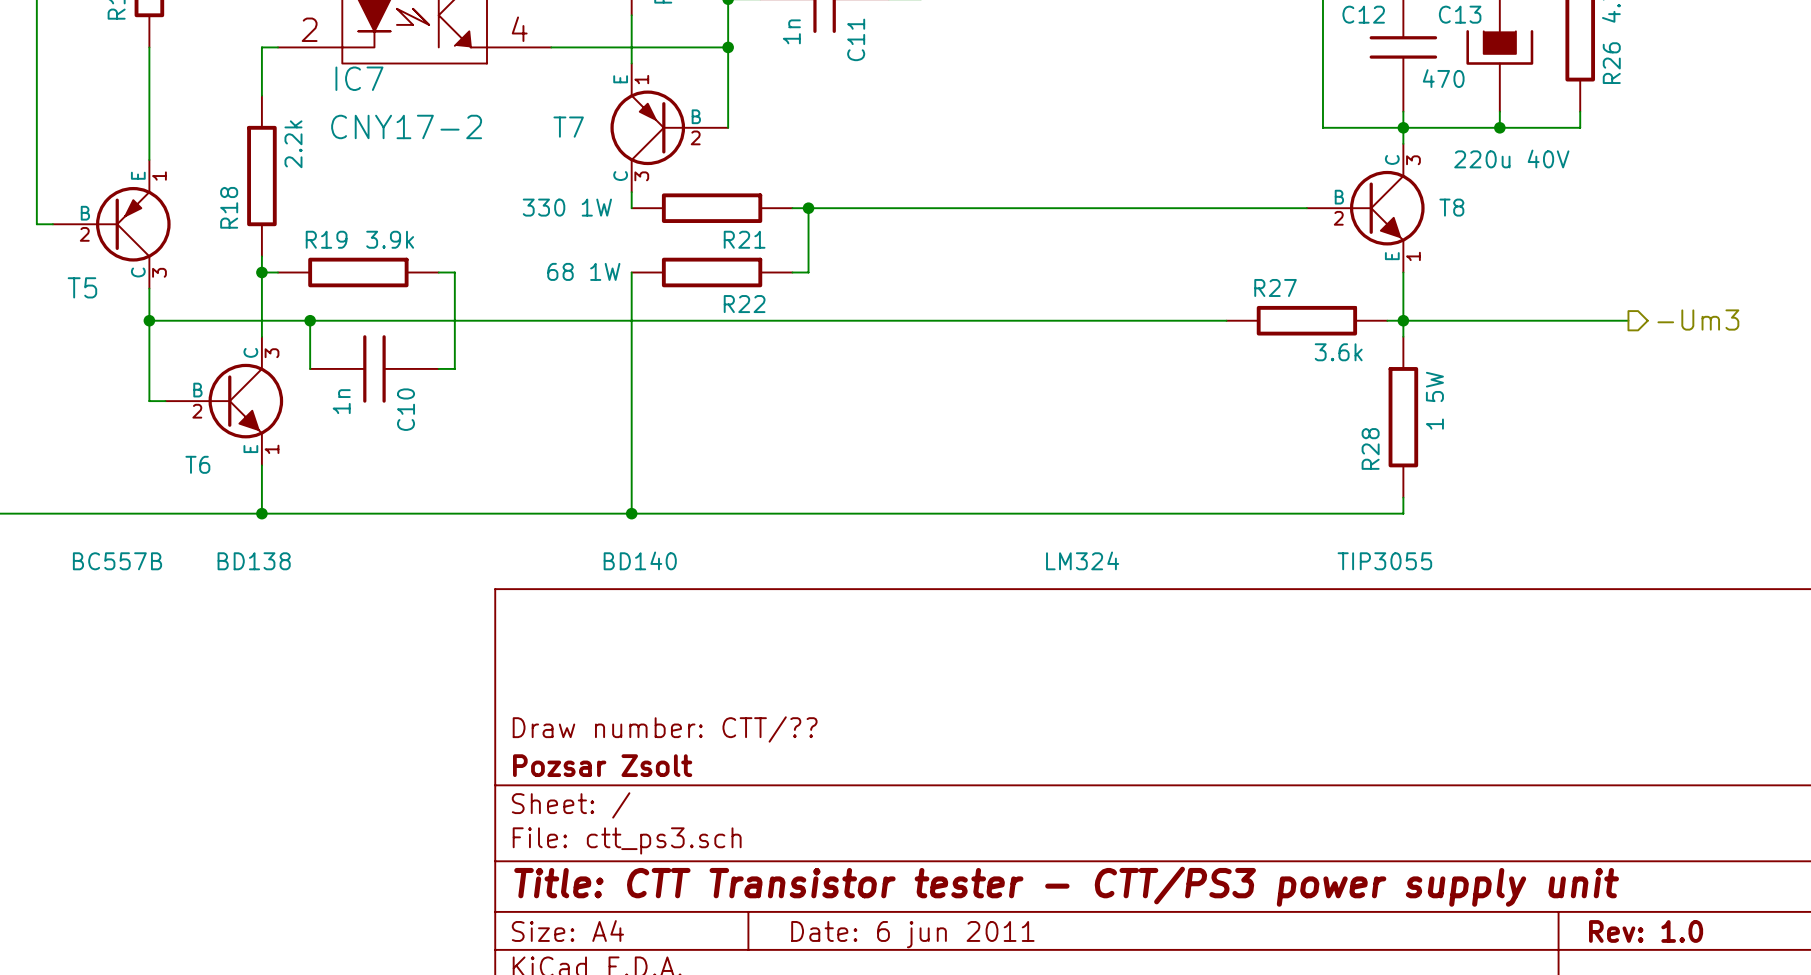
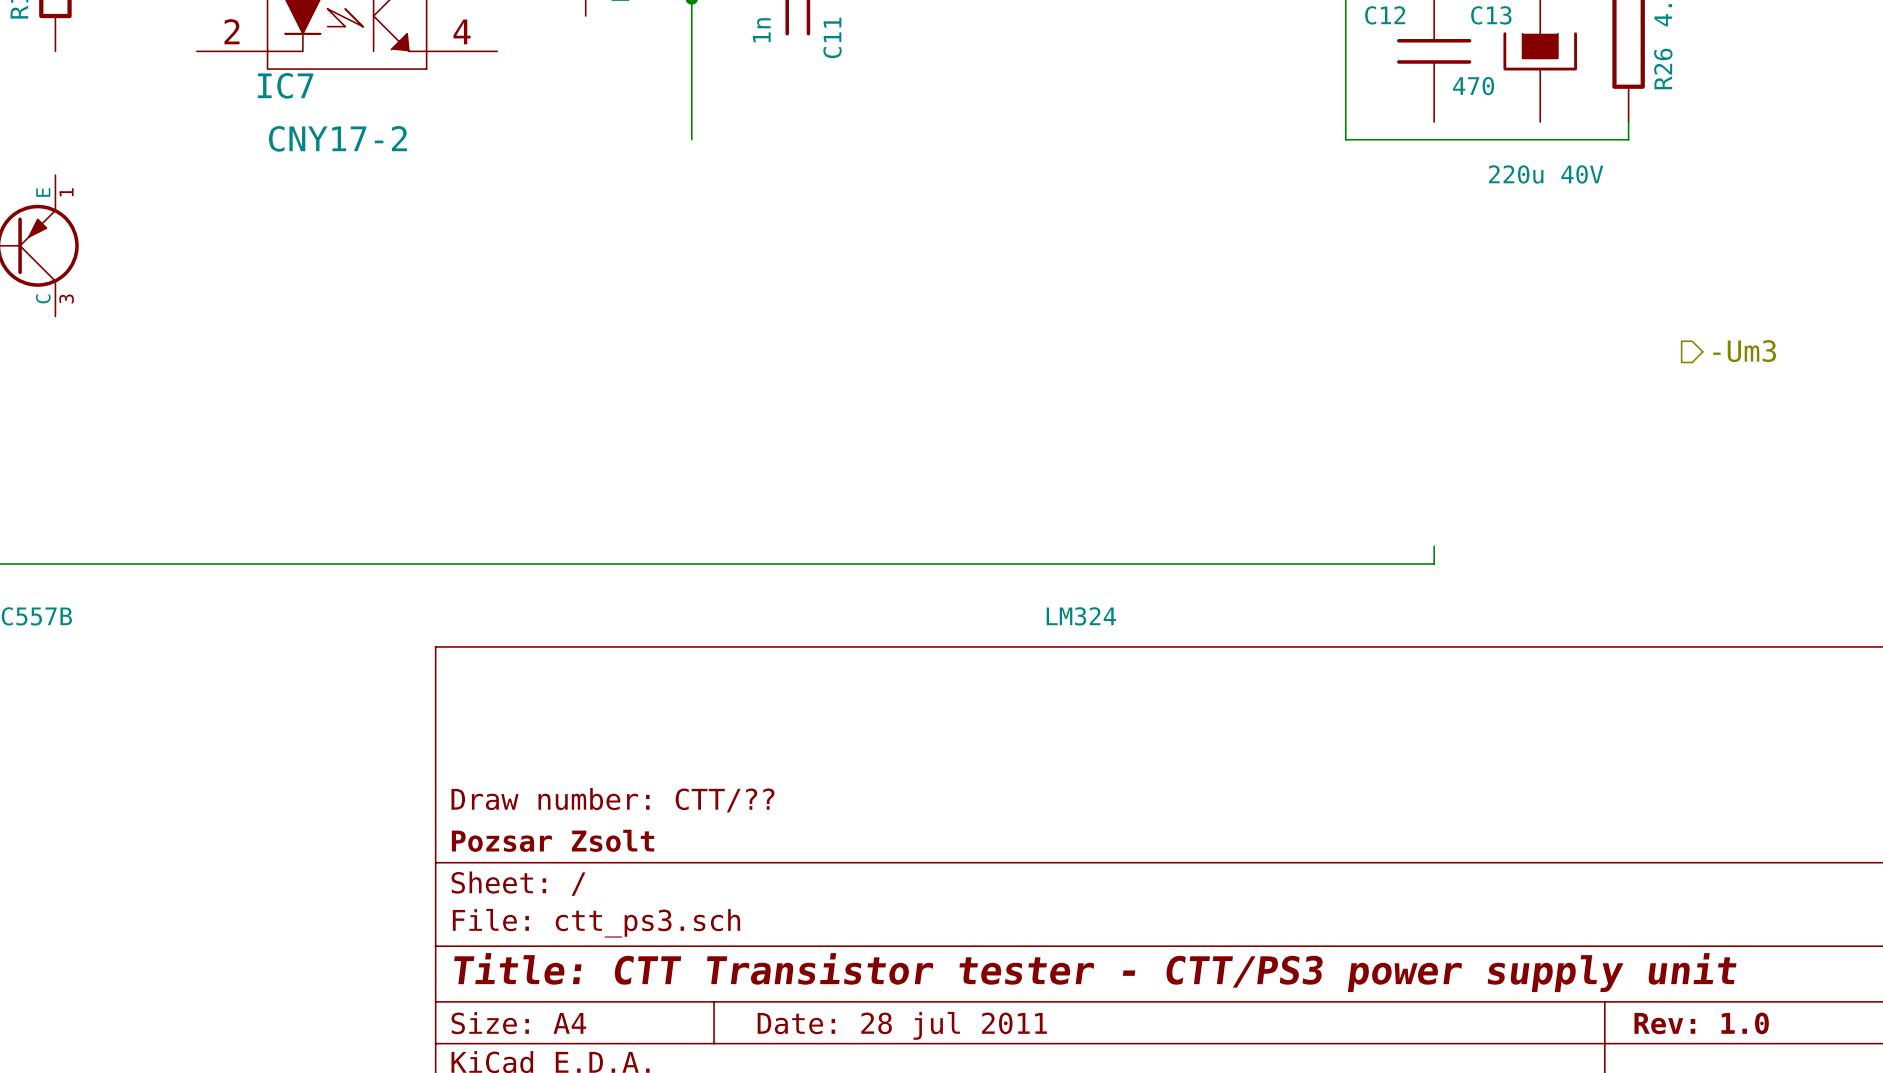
wire: (631, 15) (631, 63) -> none
wire: (149, 47) (149, 159) -> none
wire: (278, 47) (261, 47) (261, 95) -> none
wire: (551, 47) (728, 47) -> none
junction: (728, 47) -> none
wire: (1403, 111) (1403, 143) -> none
wire: (1499, 111) (1499, 127) -> none
T7: BD140 (669, 127) -> none
junction: (1403, 127) -> none
junction: (1499, 127) -> none
R18: 2.2k (261, 176) -> none
wire: (631, 192) (631, 208) -> none
R21: 330 1W (712, 208) -> none
wire: (792, 208) (1306, 208) -> none
wire: (808, 208) (808, 272) (792, 272) -> none
junction: (808, 208) -> none
T8: TIP3055 (1365, 208) -> none
wire: (261, 256) (261, 336) -> none
wire: (261, 272) (278, 272) -> none
junction: (261, 272) -> none
R19: 3.9k (358, 272) -> none
wire: (438, 272) (454, 272) (454, 368) (438, 368) -> none
wire: (631, 272) (631, 513) -> none
R22: 68 1W (712, 272) -> none
wire: (1403, 272) (1403, 336) -> none
wire: (149, 288) (149, 401) (165, 401) -> none
wire: (149, 320) (1226, 320) -> none
junction: (149, 320) -> none
wire: (310, 320) (310, 368) -> none
junction: (310, 320) -> none
R27: 3.6k (1306, 320) -> none
wire: (1387, 320) (1628, 320) -> none
junction: (1403, 320) -> none
C10: 1n (374, 368) -> none
T6: BD138 (224, 401) -> none
R28: 1 5W (1403, 417) -> none
wire: (261, 465) (261, 513) -> none
junction: (261, 513) -> none
junction: (631, 513) -> none
title block: Date: 6 jun 2011 (912, 934) -> Date: 28 jul 2011 (902, 1025)

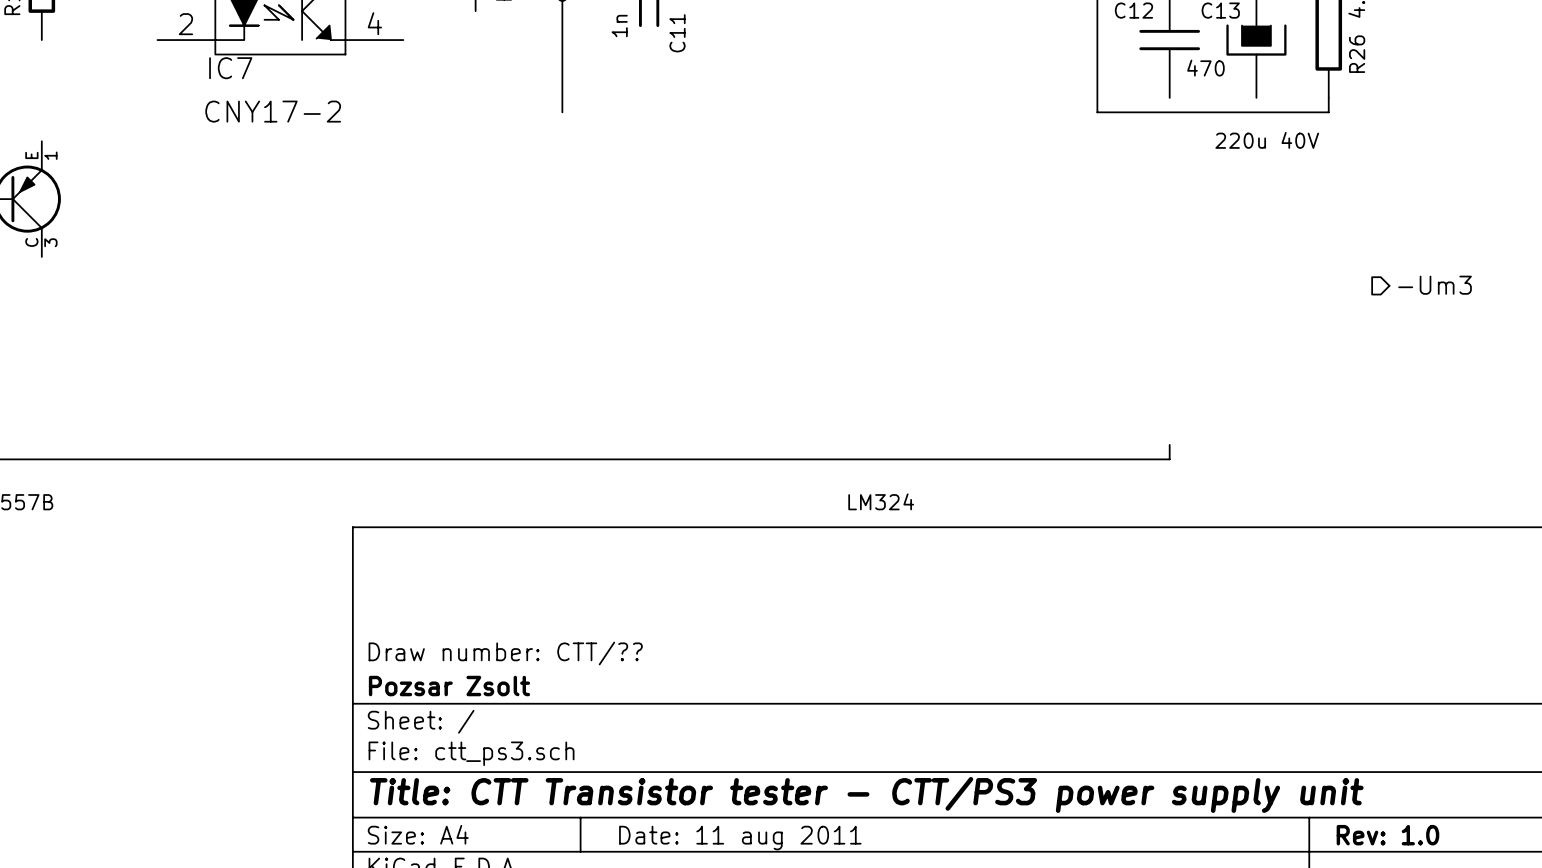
title block: Date: 28 jul 2011 (902, 1025) -> Date: 11 aug 2011 (740, 838)

